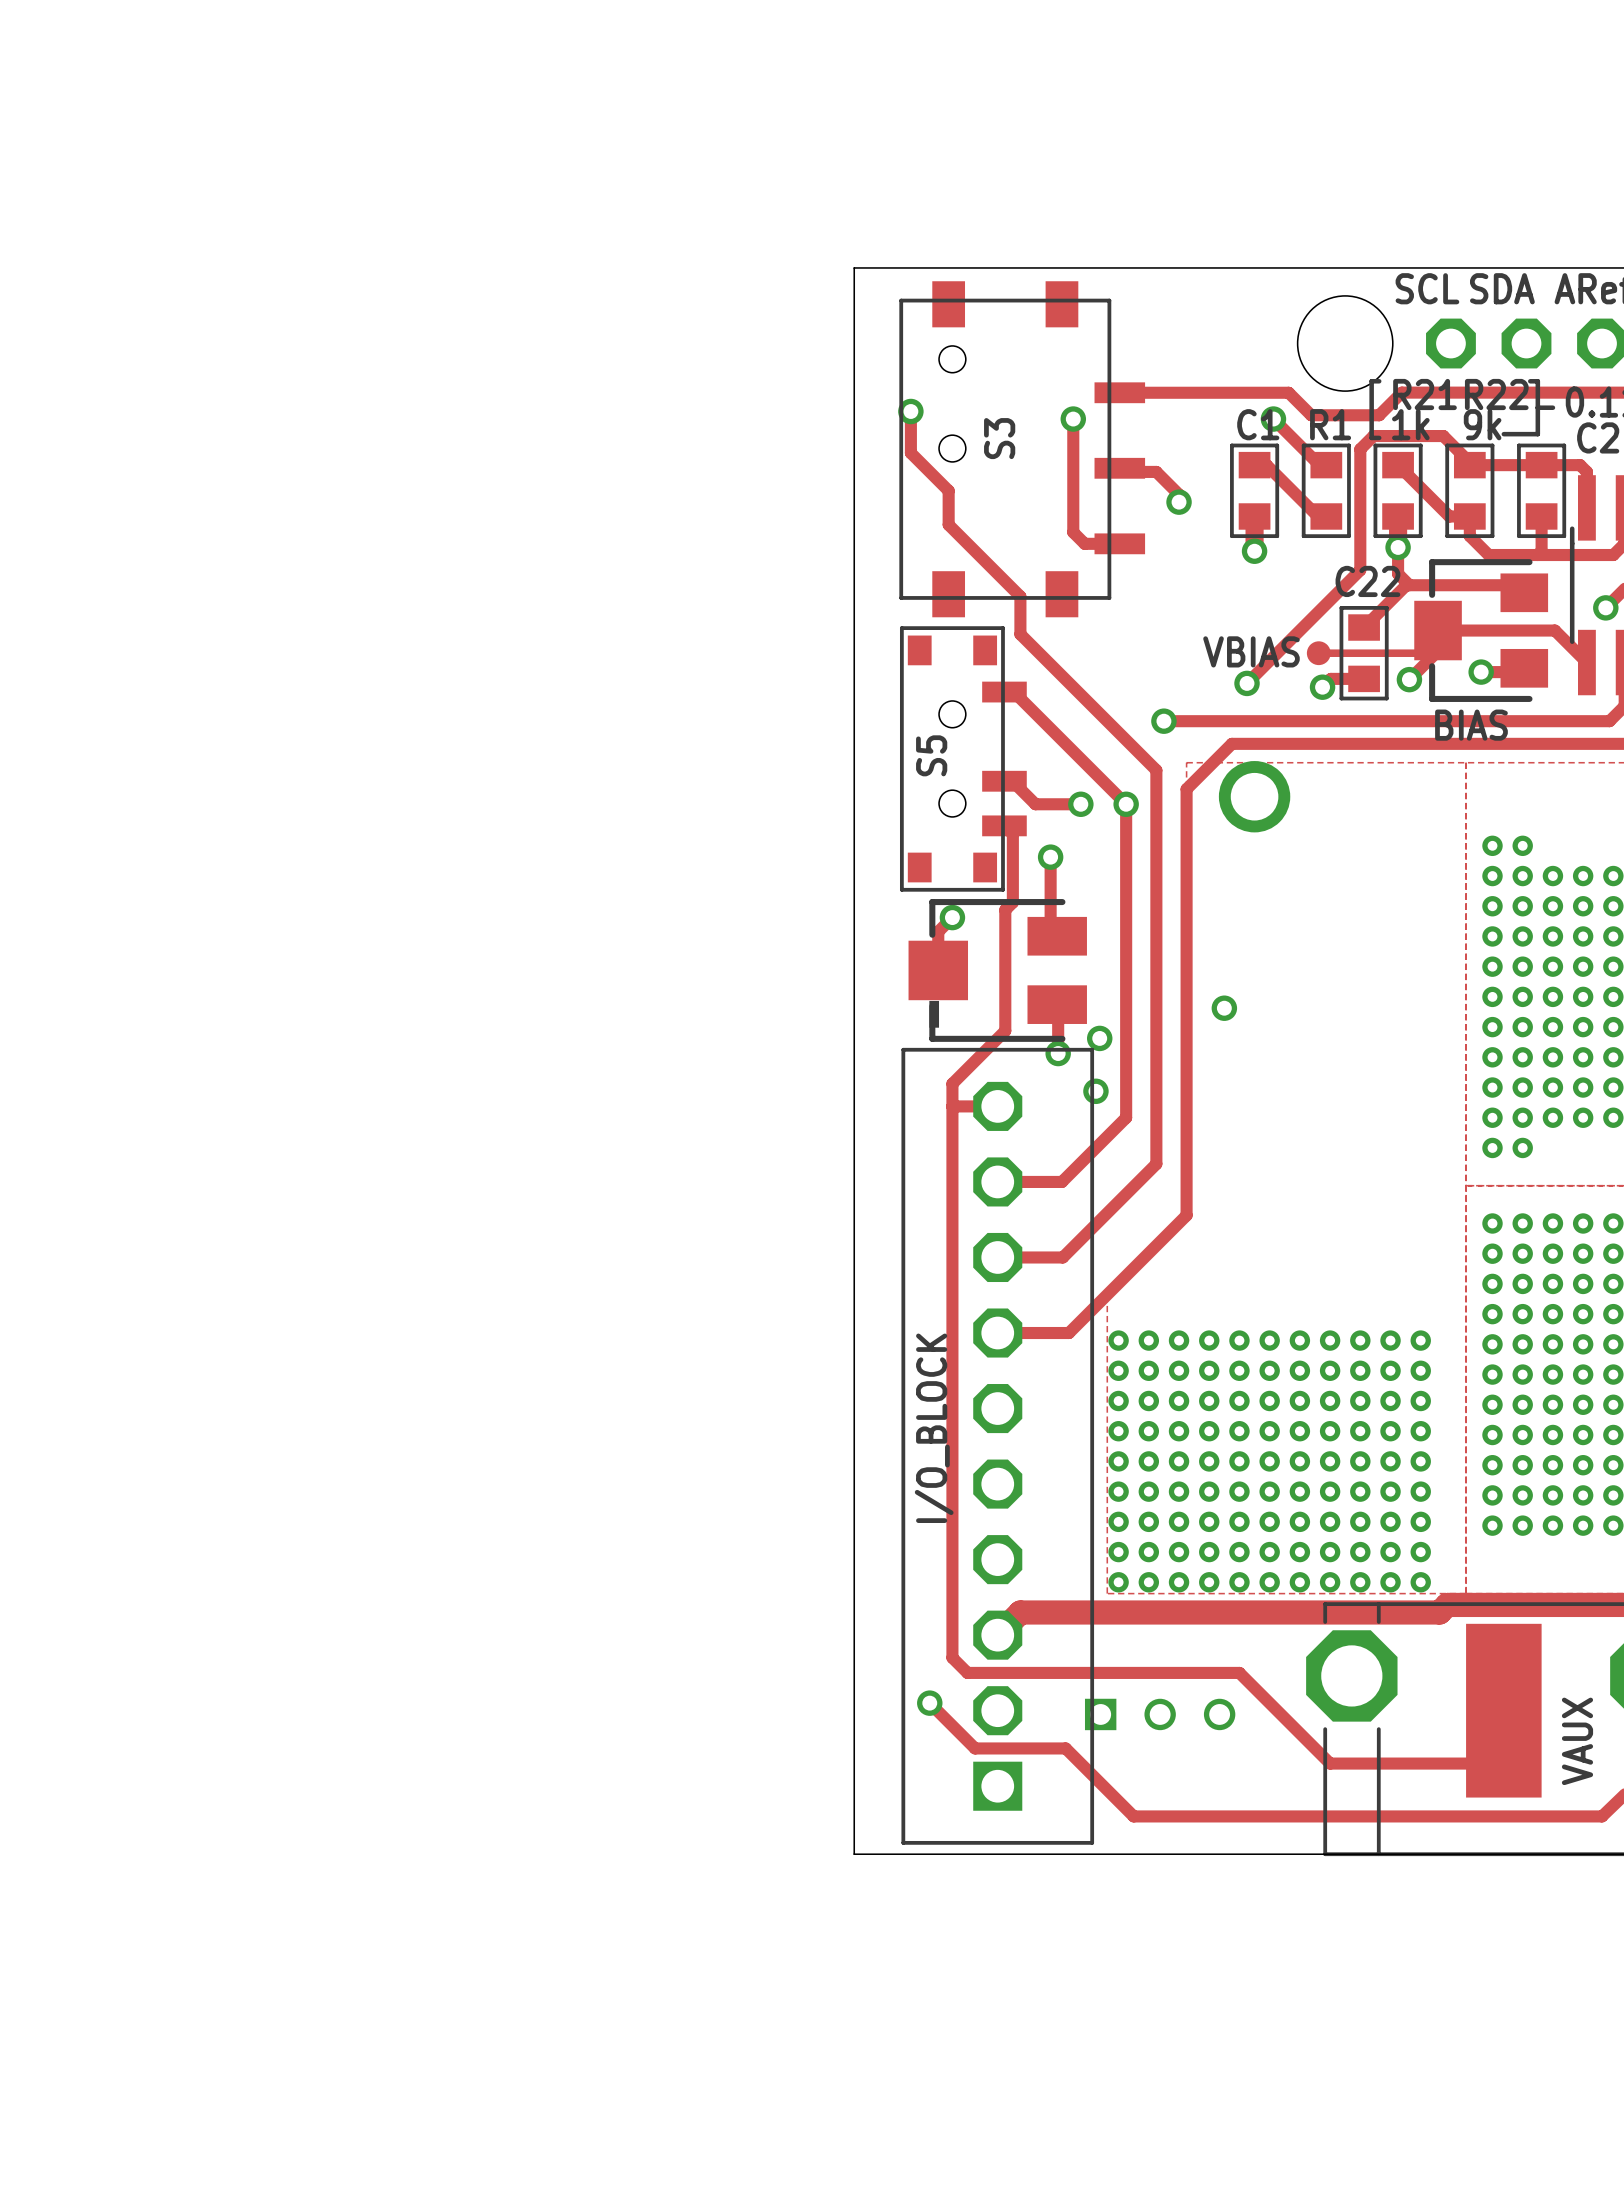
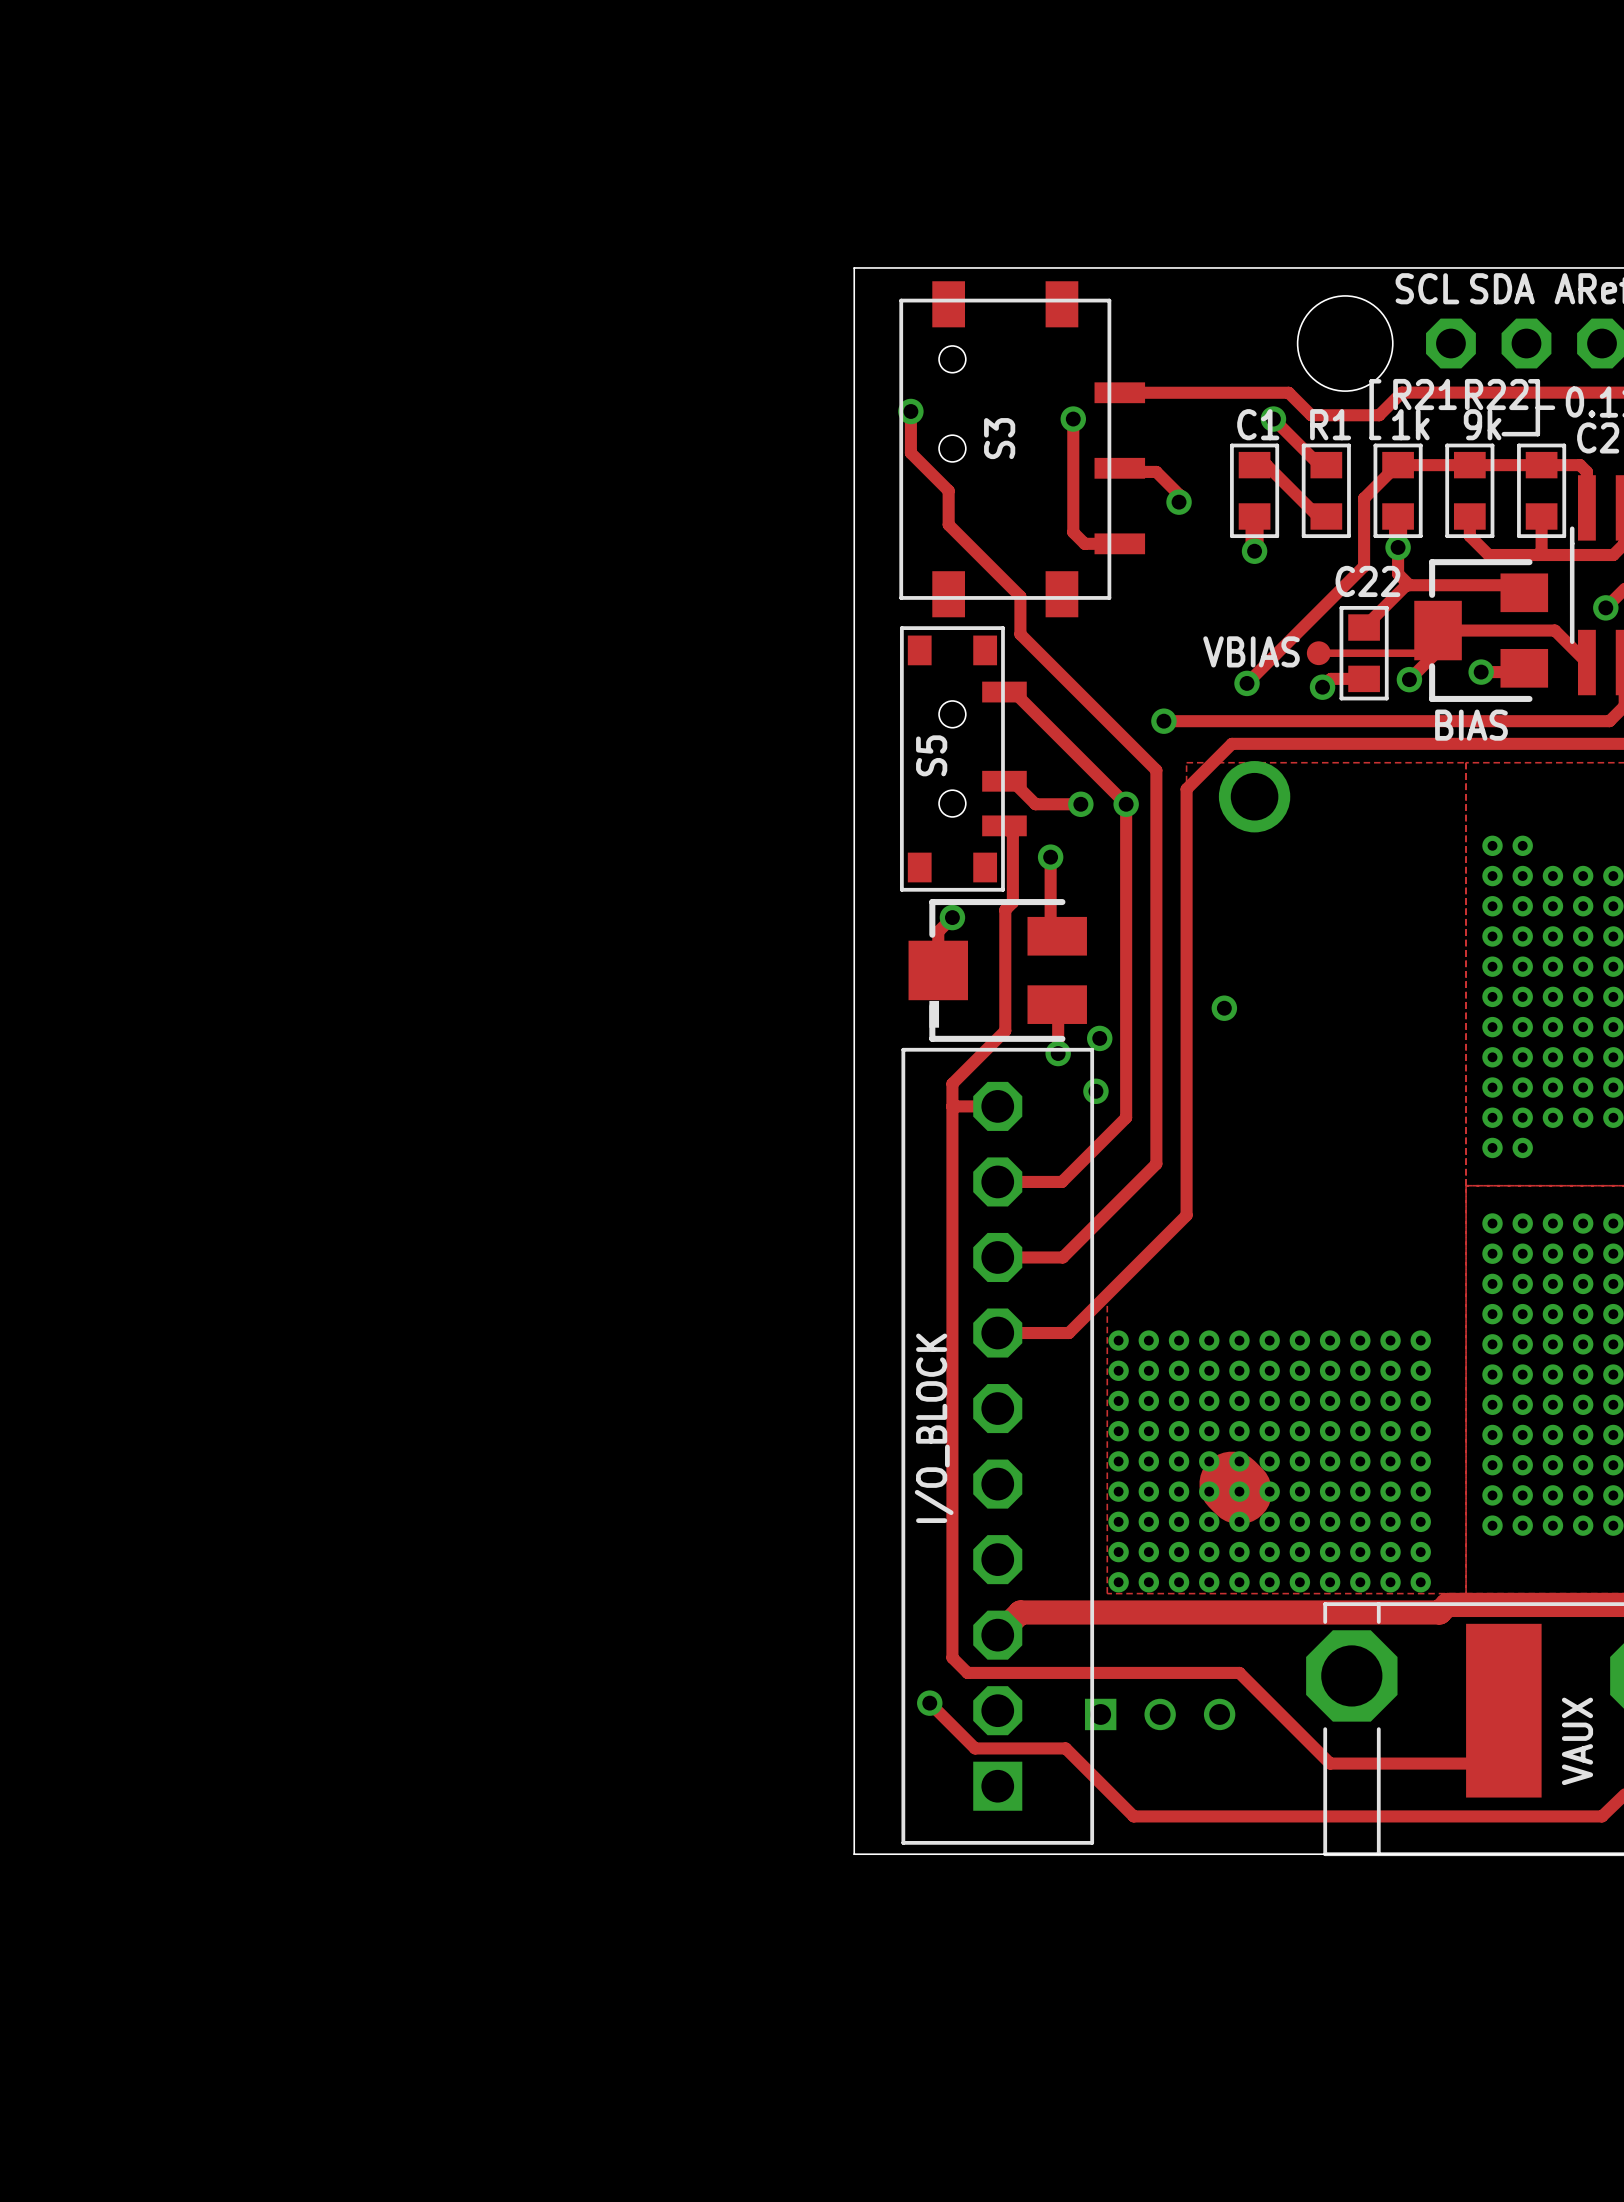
track: (1398, 465) (1449, 516) (1469, 516) -> none
track: (1469, 465) (1469, 462) (1443, 436) (1373, 436) (1360, 449) (1360, 570) -> (1469, 465) (1397, 465) (1364, 498) (1364, 566) (1360, 570)
track: none -> (1231, 1484) (1239, 1491)

